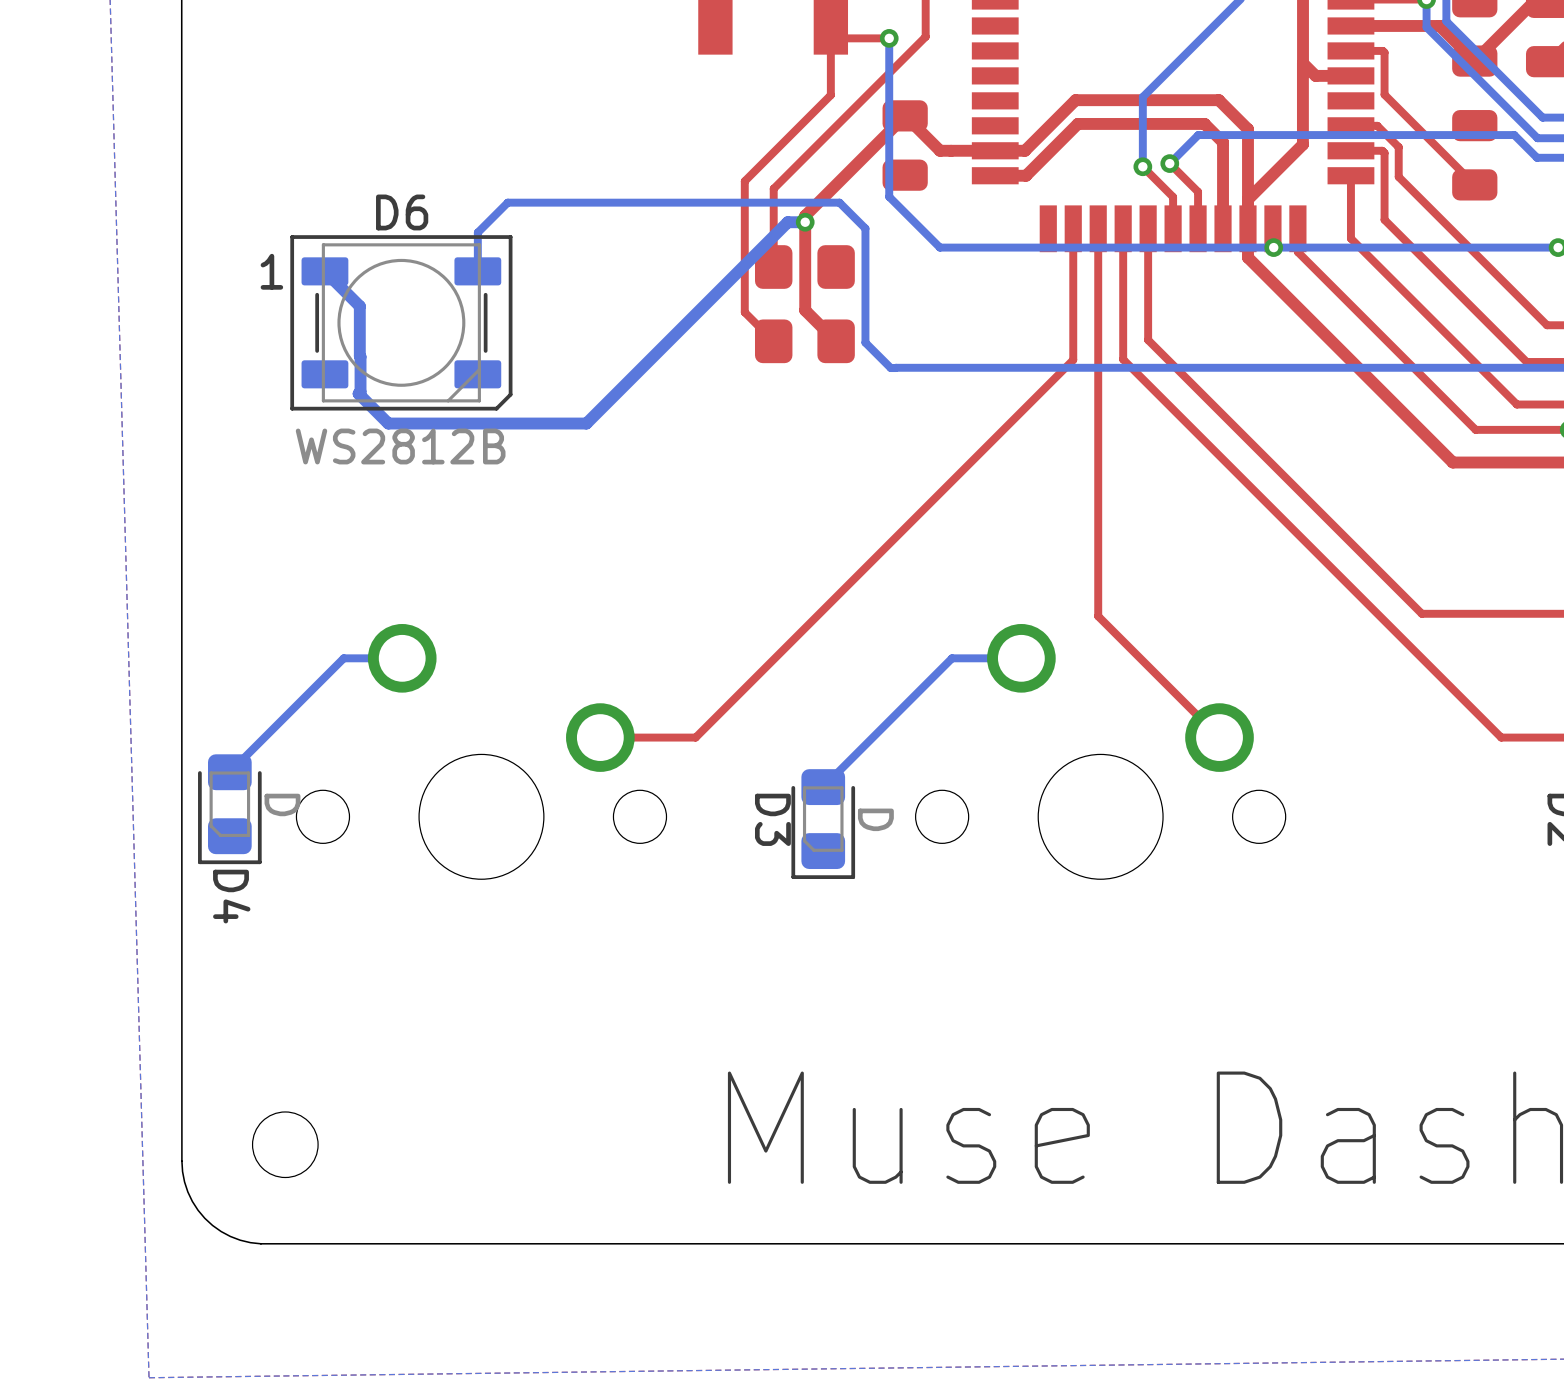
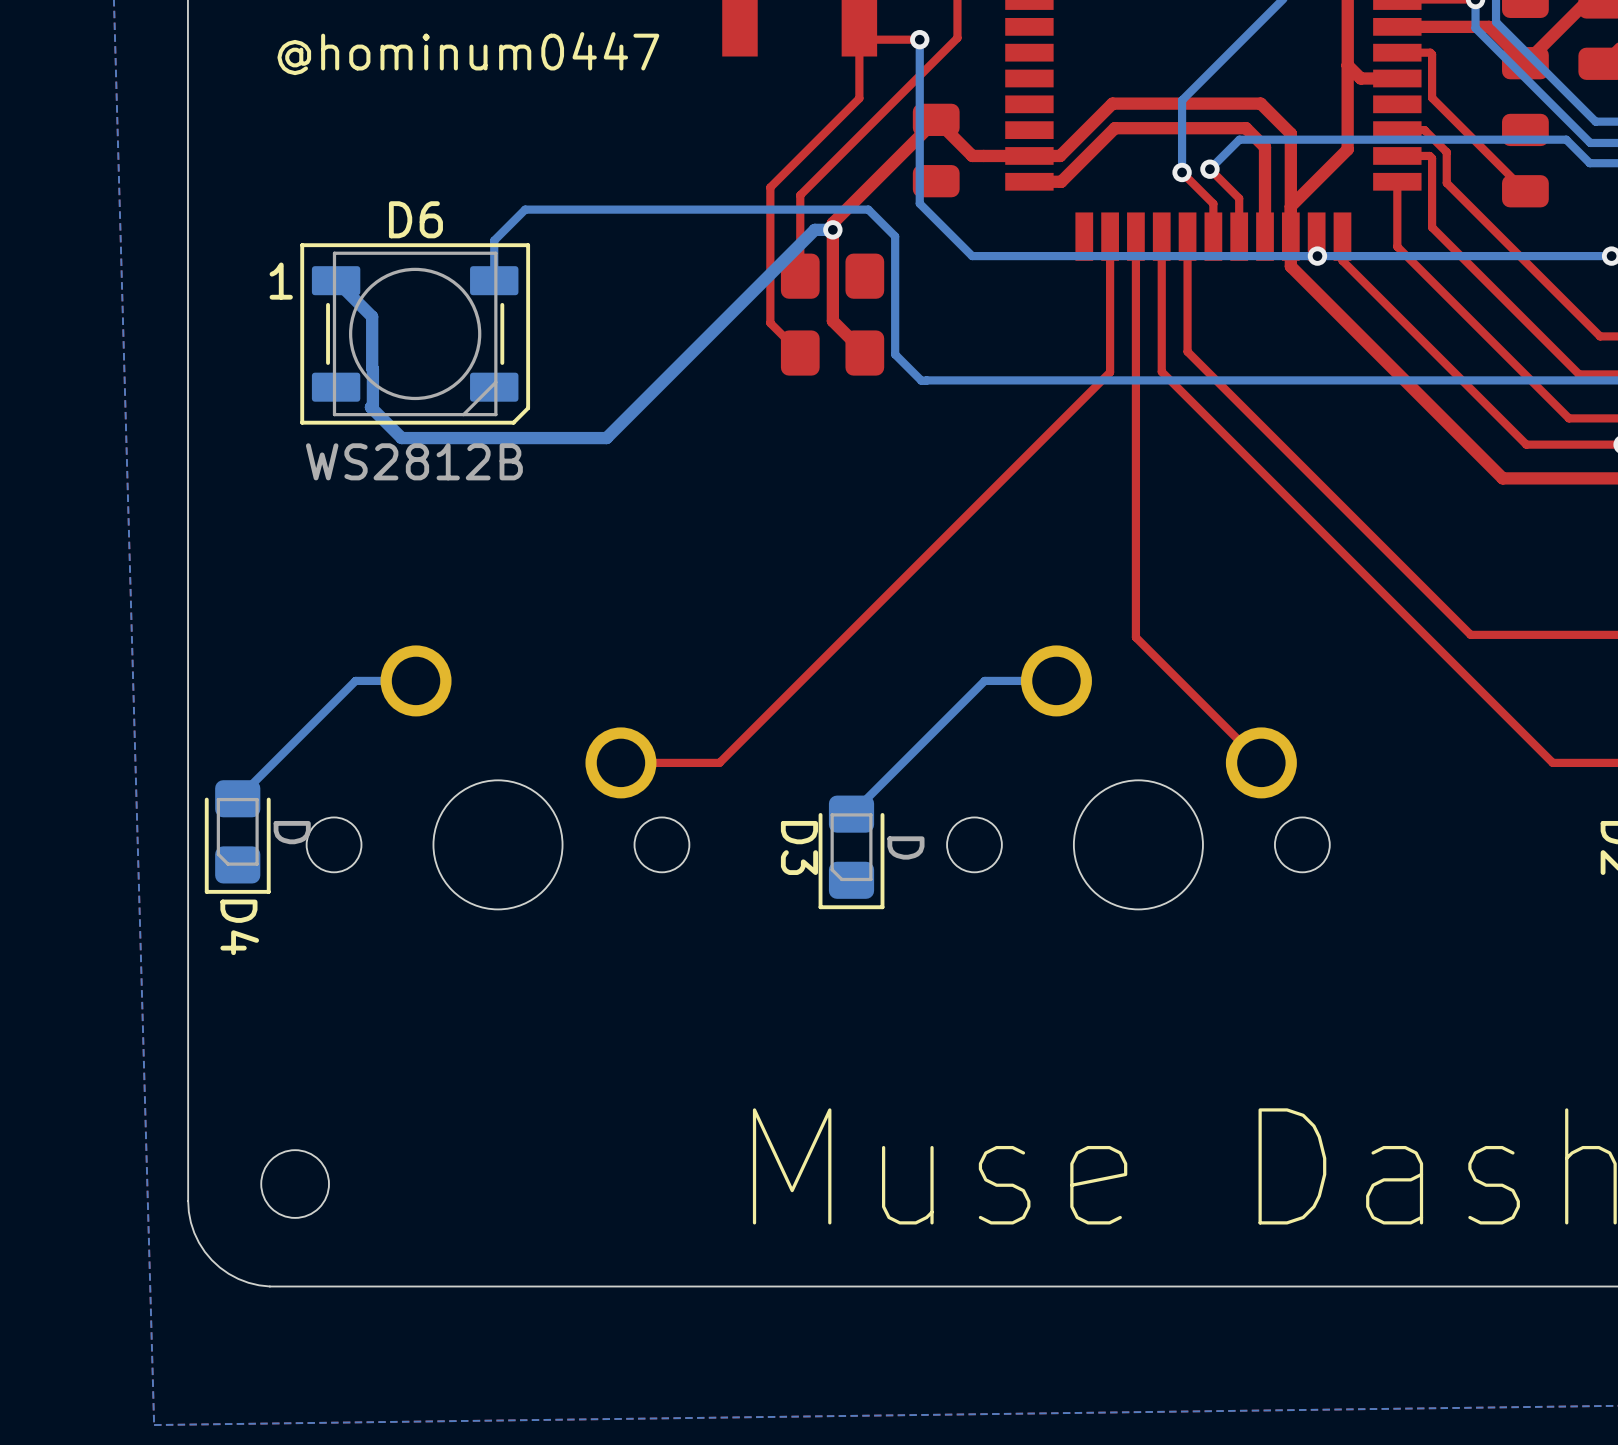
text: none -> @hominum0447 (468, 53)

